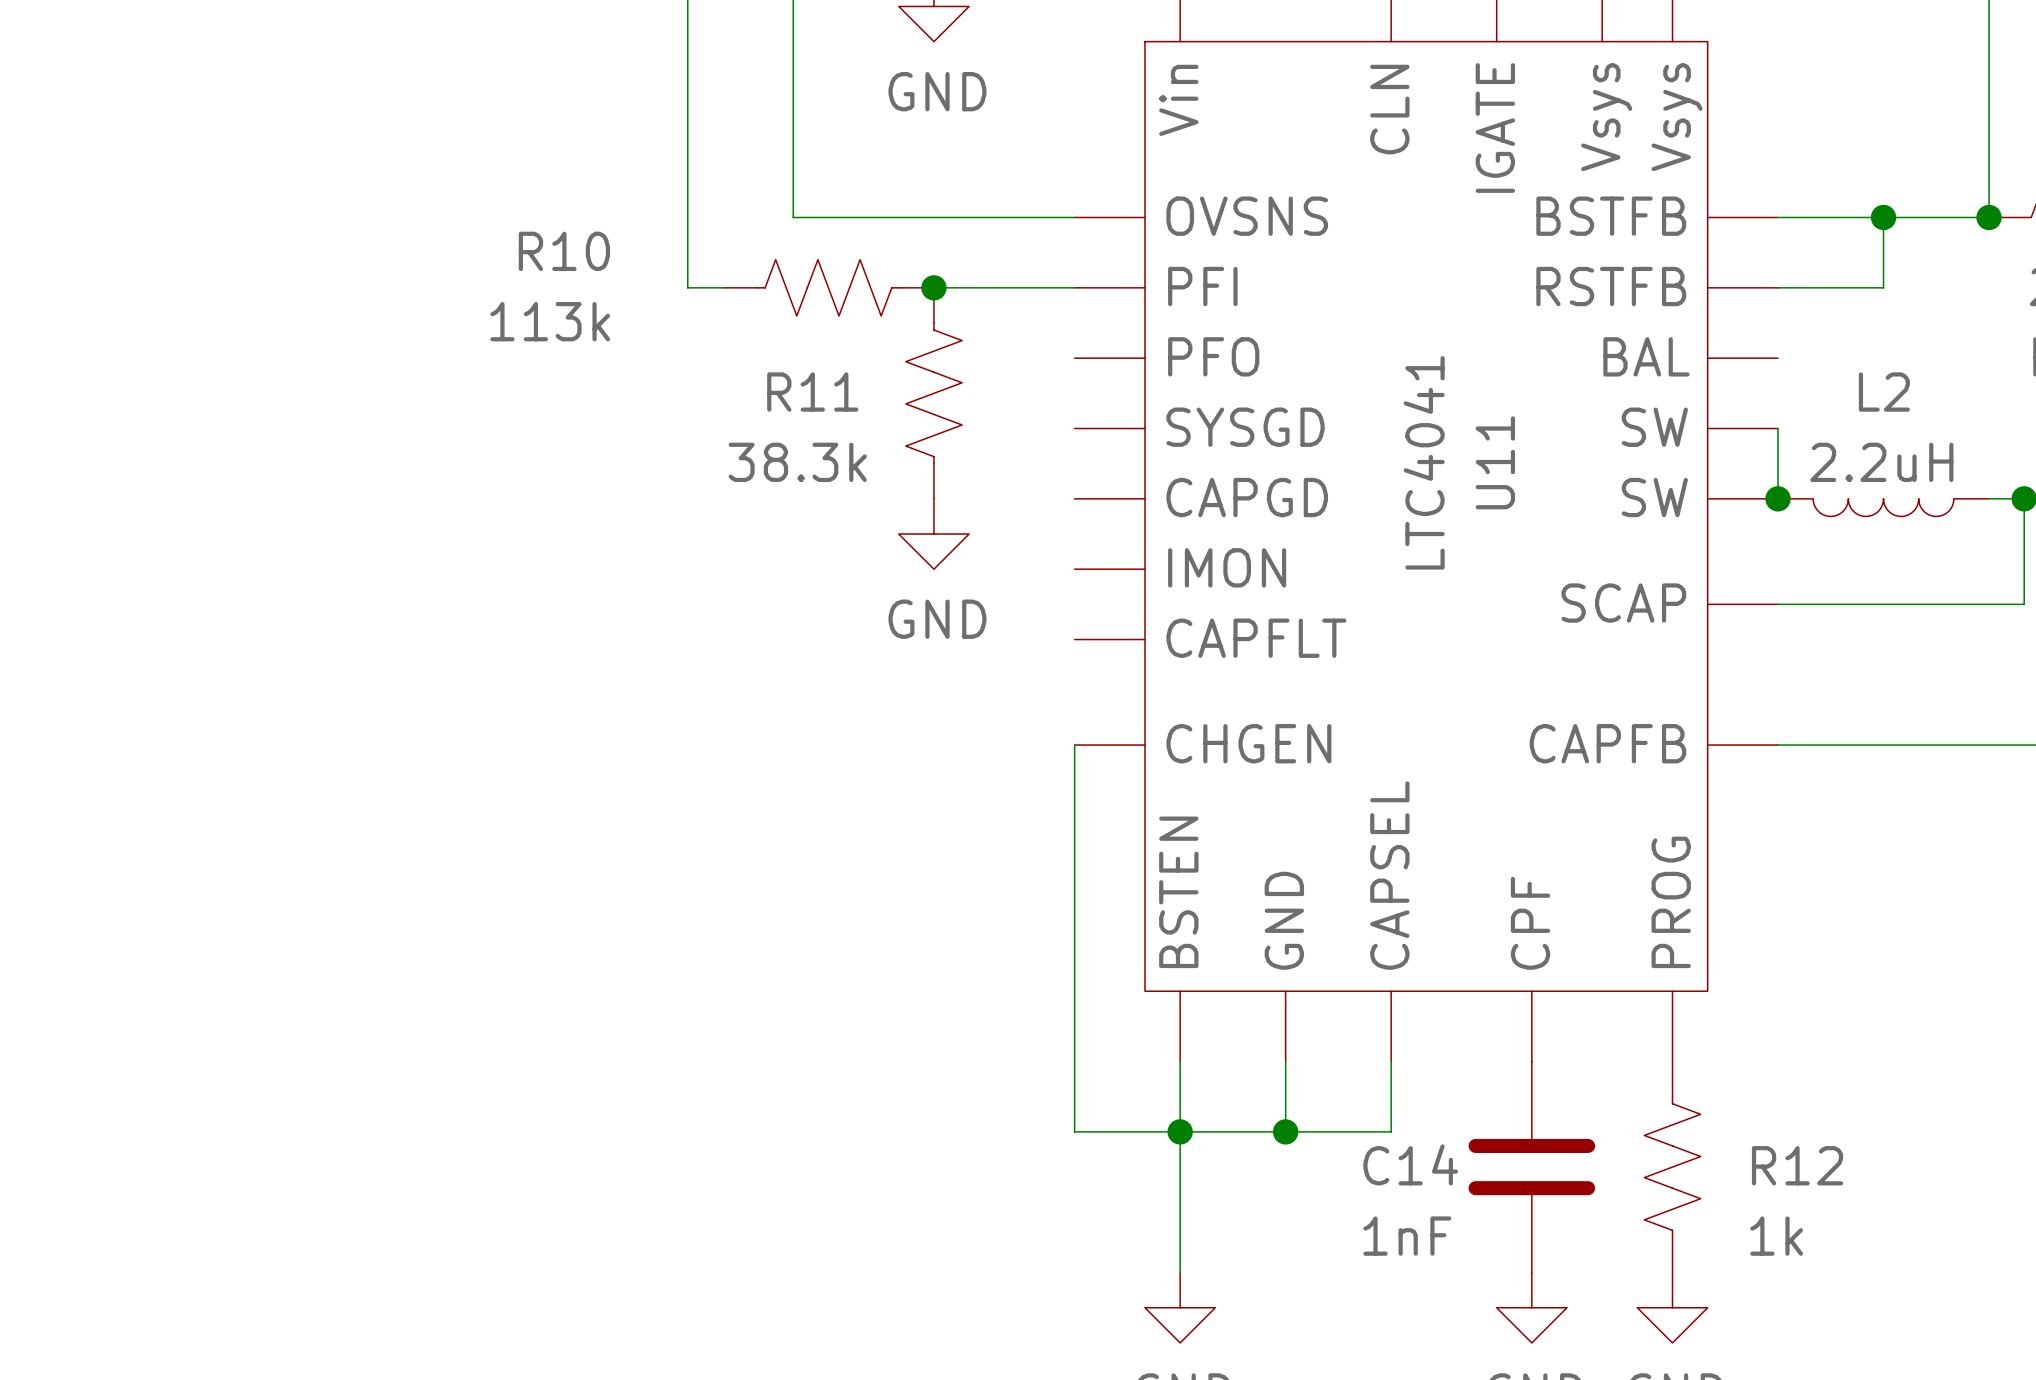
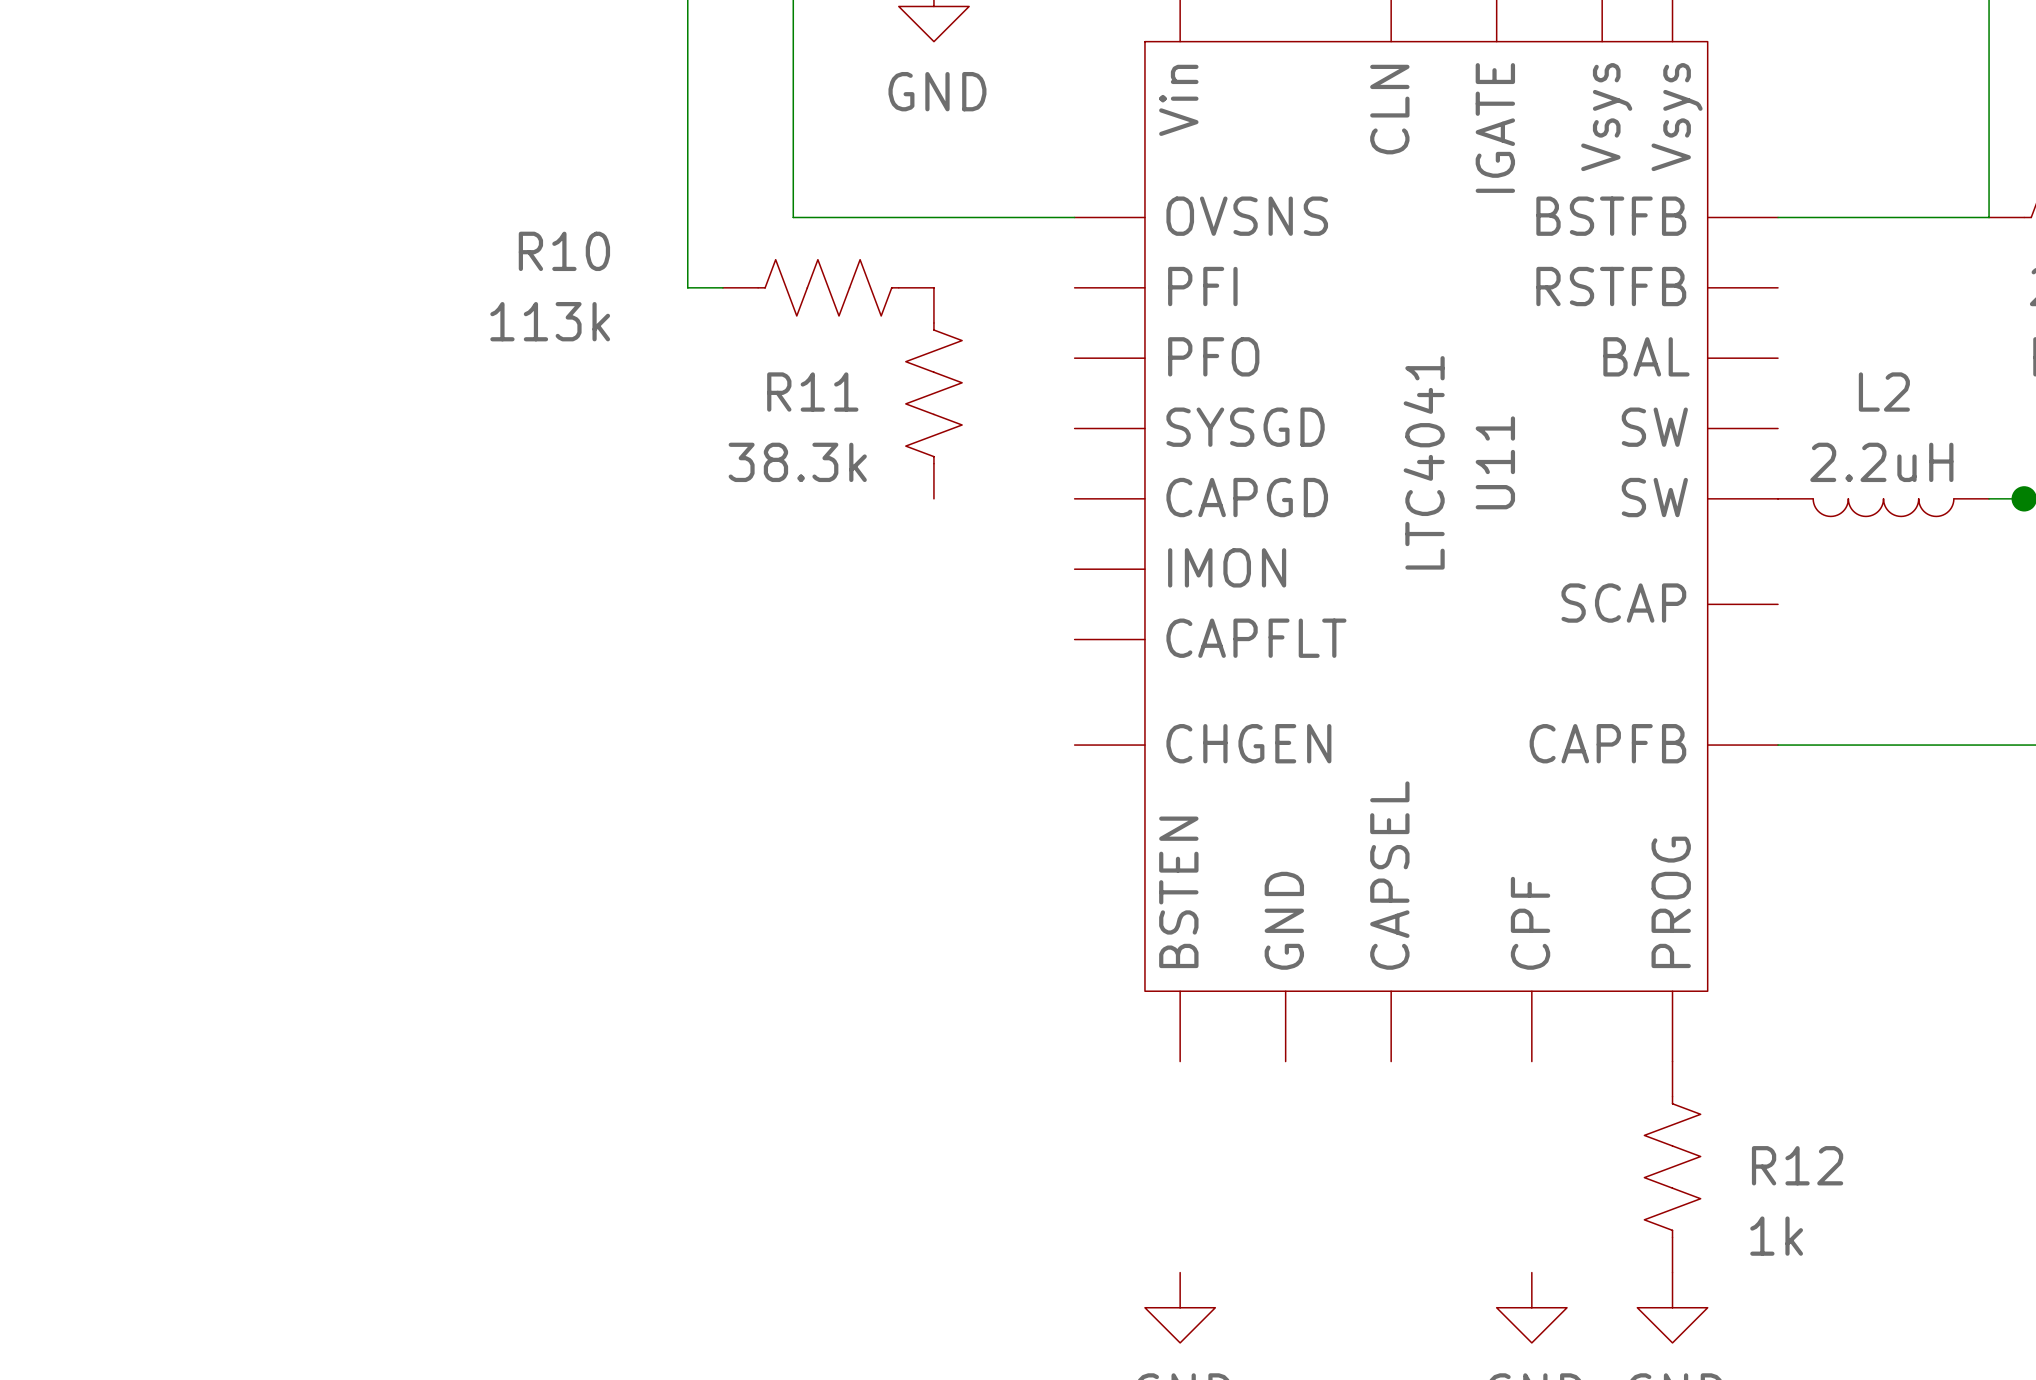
wire: (1883, 217) (1883, 287) (1778, 287) -> none
junction: (1883, 217) -> none
junction: (1989, 217) -> none
wire: (933, 287) (1074, 287) -> none
junction: (933, 287) -> none
wire: (1778, 428) (1778, 498) -> none
junction: (1778, 498) -> none
wire: (2024, 498) (2024, 604) (1778, 604) -> none
power symbol: GND (933, 534) -> none
wire: (1074, 745) (1074, 1131) (1391, 1131) (1391, 1061) -> none
wire: (1180, 1061) (1180, 1272) -> none
wire: (1285, 1061) (1285, 1131) -> none
junction: (1180, 1131) -> none
junction: (1285, 1131) -> none
C14: 1nF (1531, 1167) -> none

